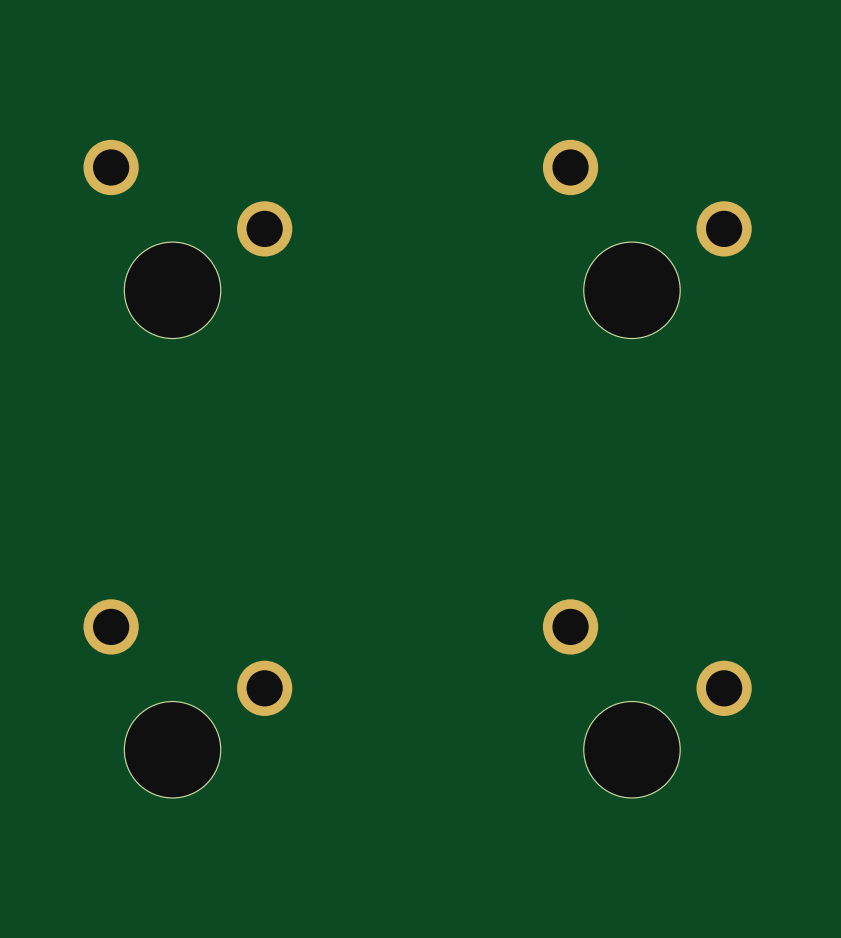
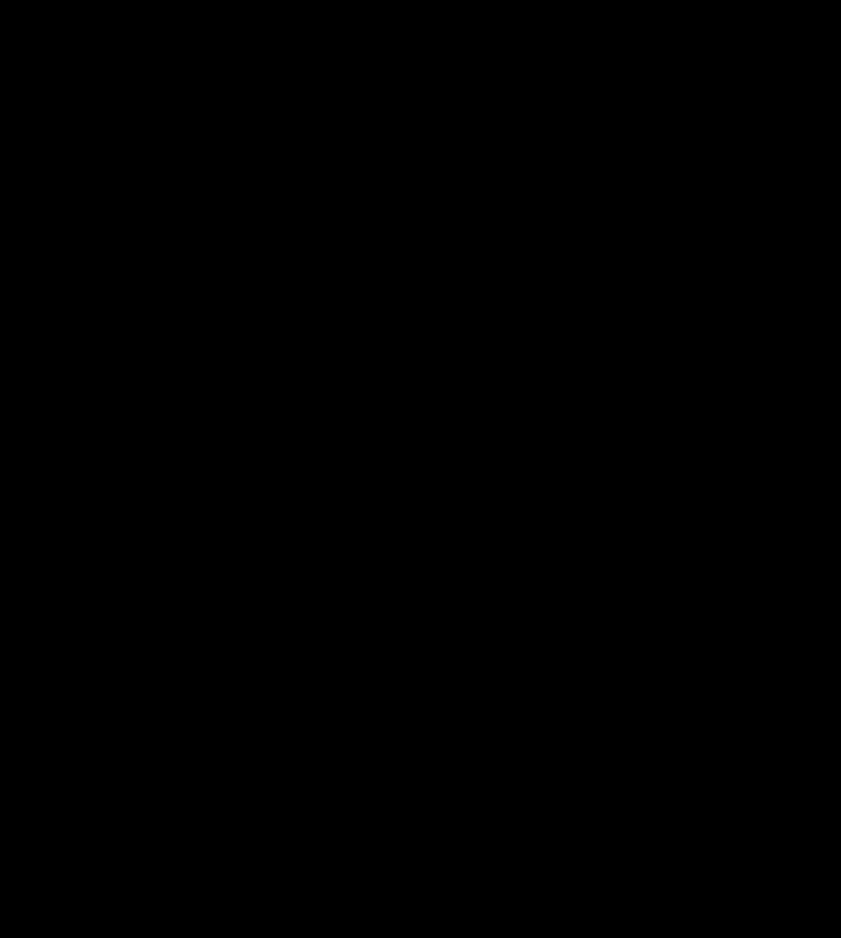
part: (187, 239) -> none
part: (647, 239) -> none
part: (187, 698) -> none
part: (647, 698) -> none

